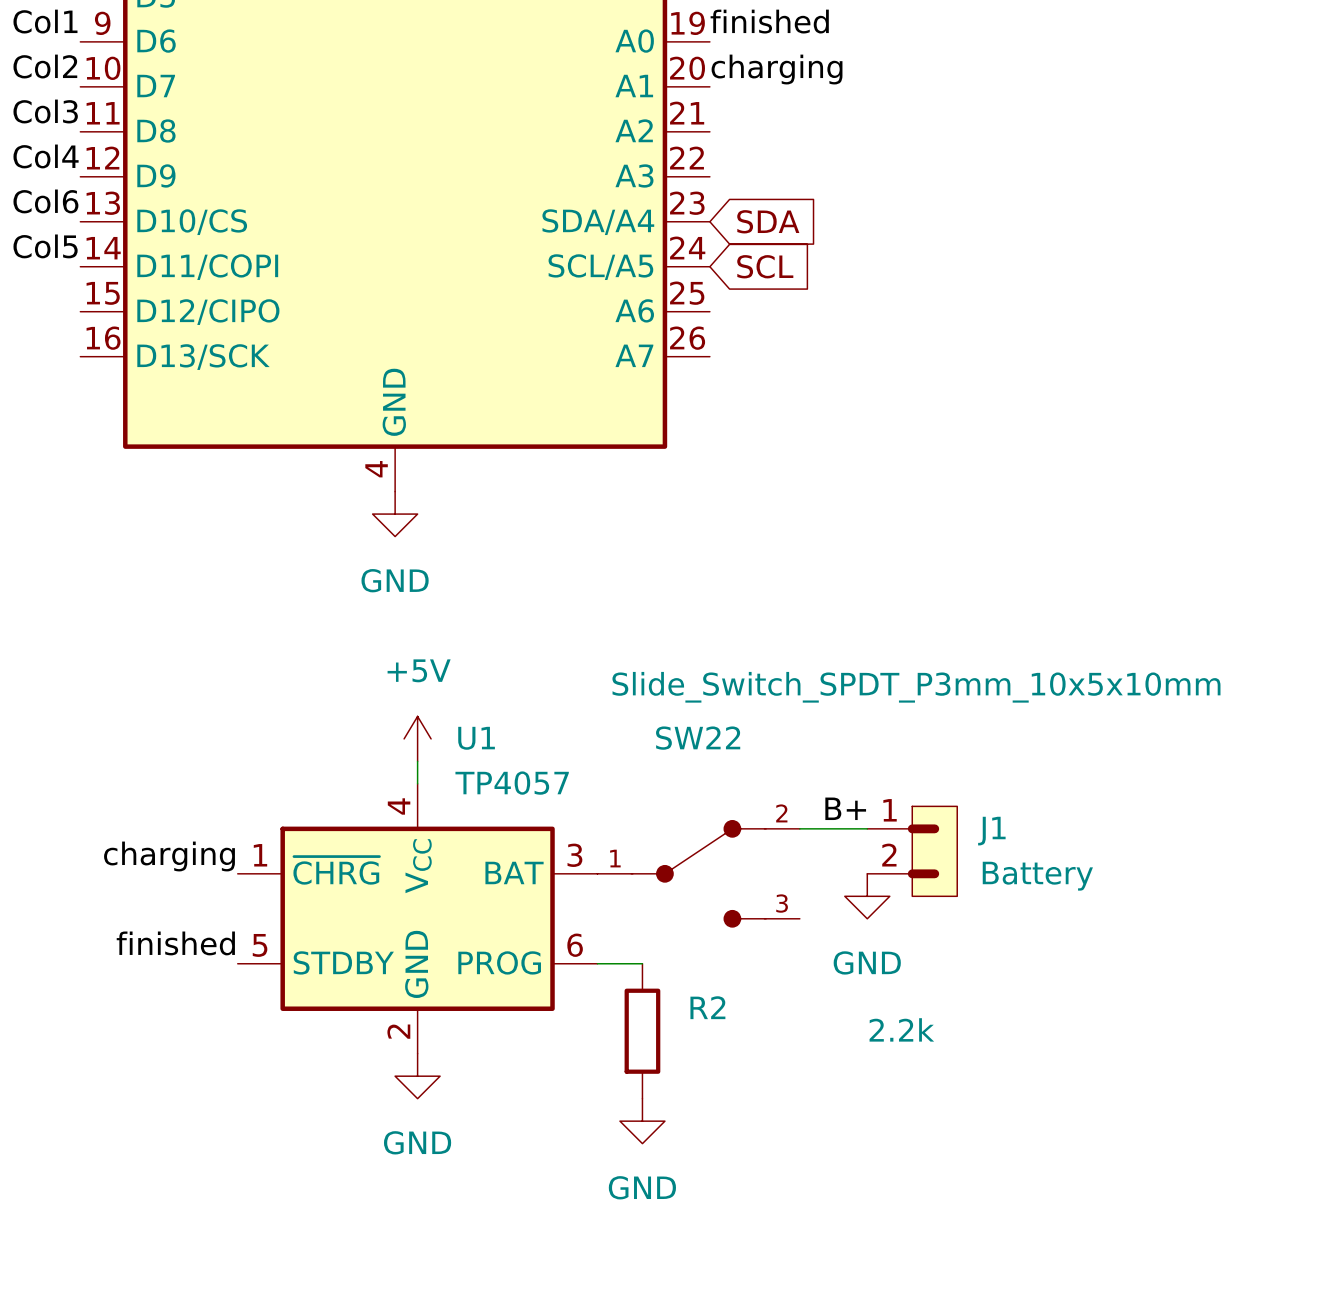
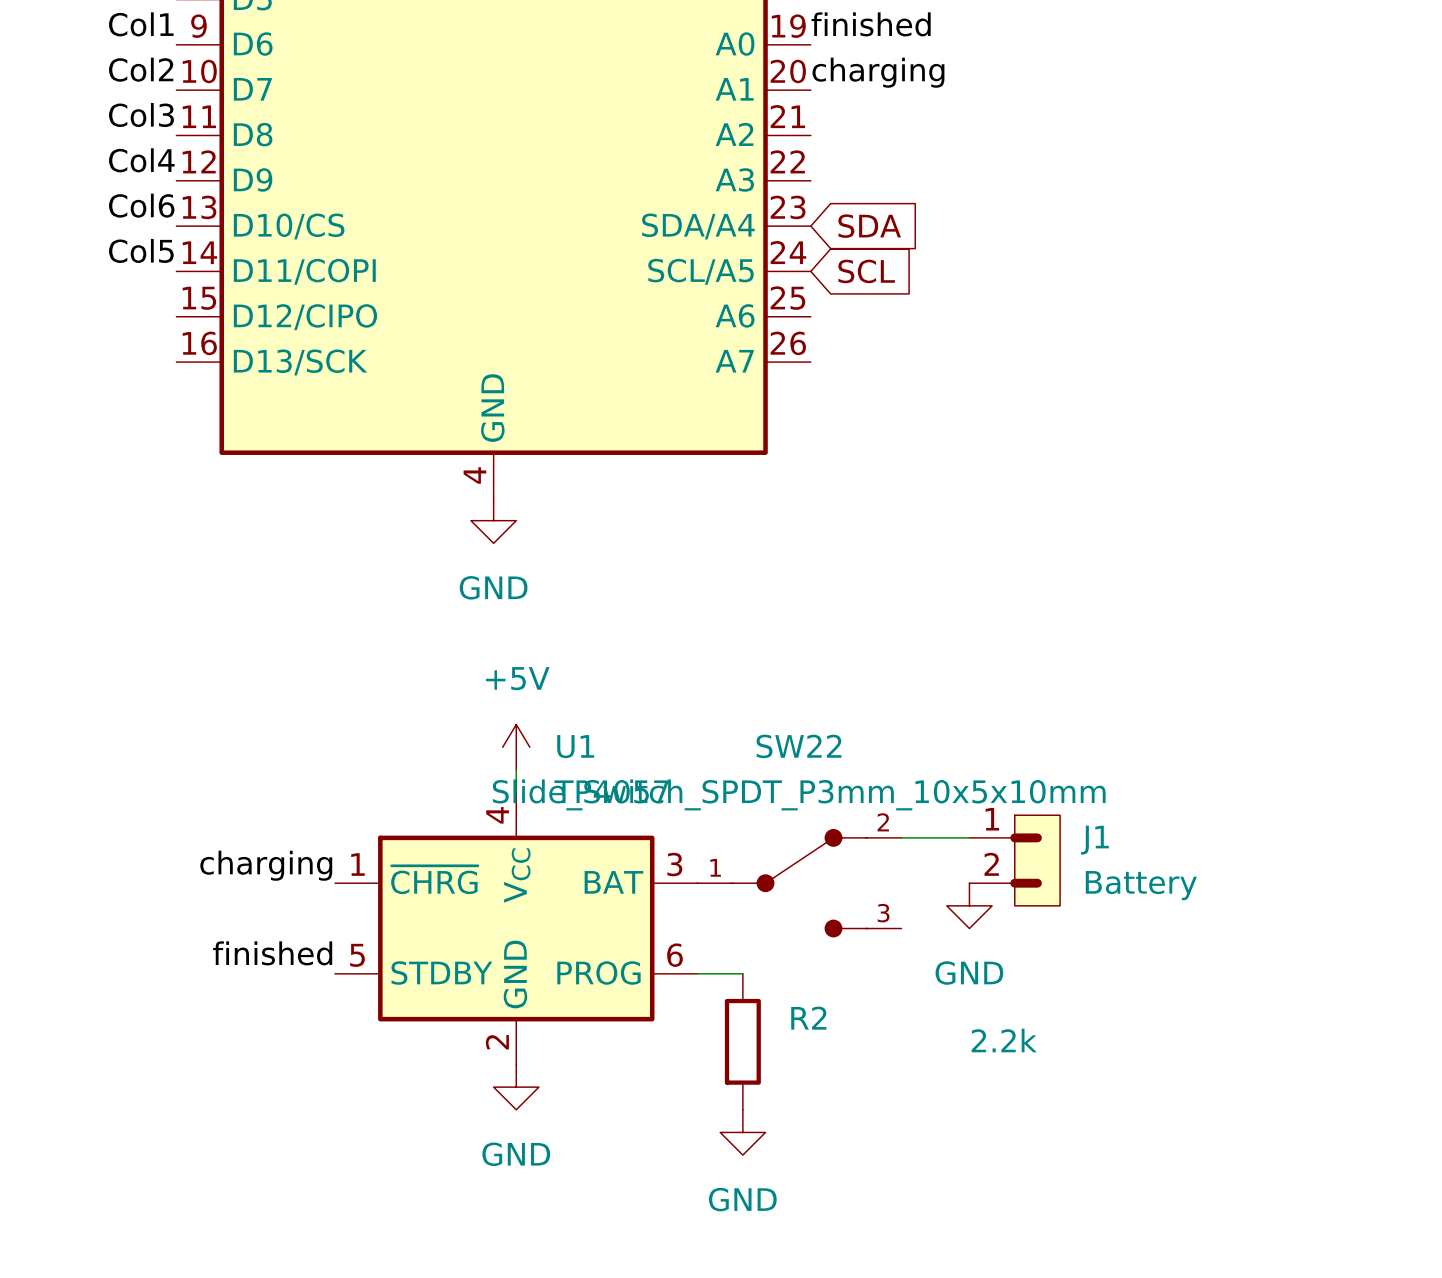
SW22 value position: Slide_Switch_SPDT_P3mm_10x5x10mm (916, 687) -> Slide_Switch_SPDT_P3mm_10x5x10mm (799, 794)
label: B+ (845, 808) -> none

